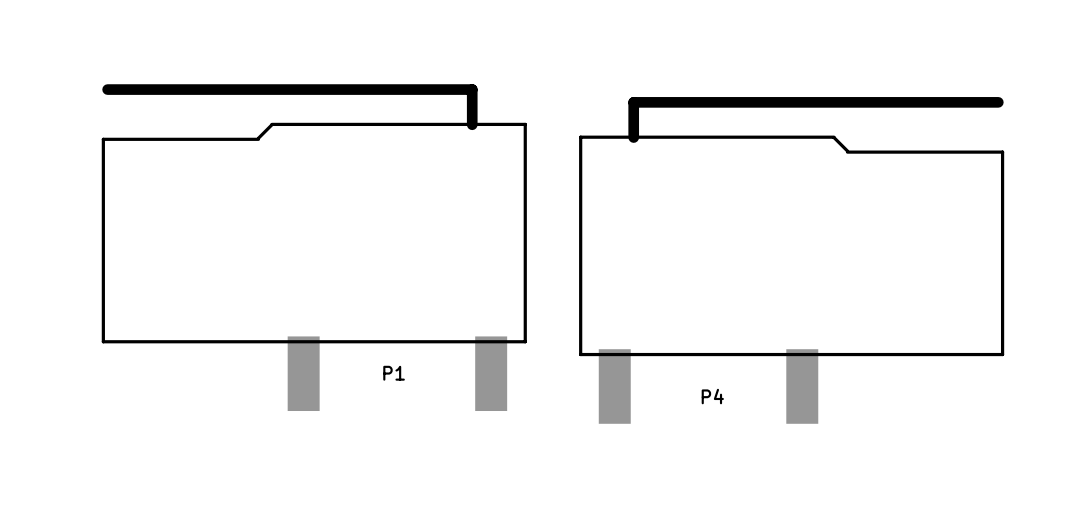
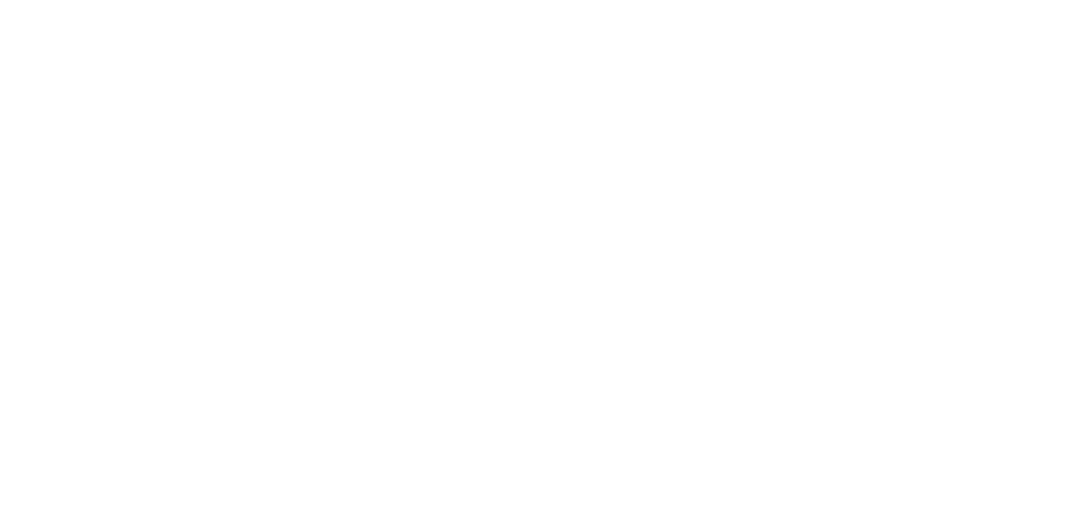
P1: (314, 247) -> none
P4: (791, 260) -> none

